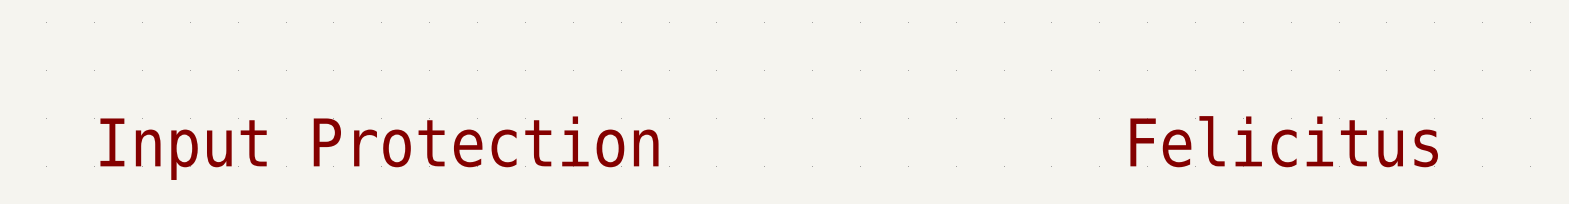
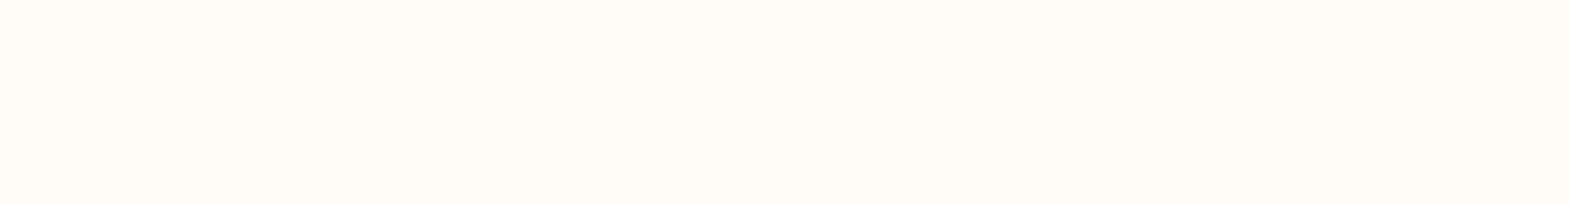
text: Felicitus (1284, 141) -> none
text: Input Protection (379, 148) -> none

